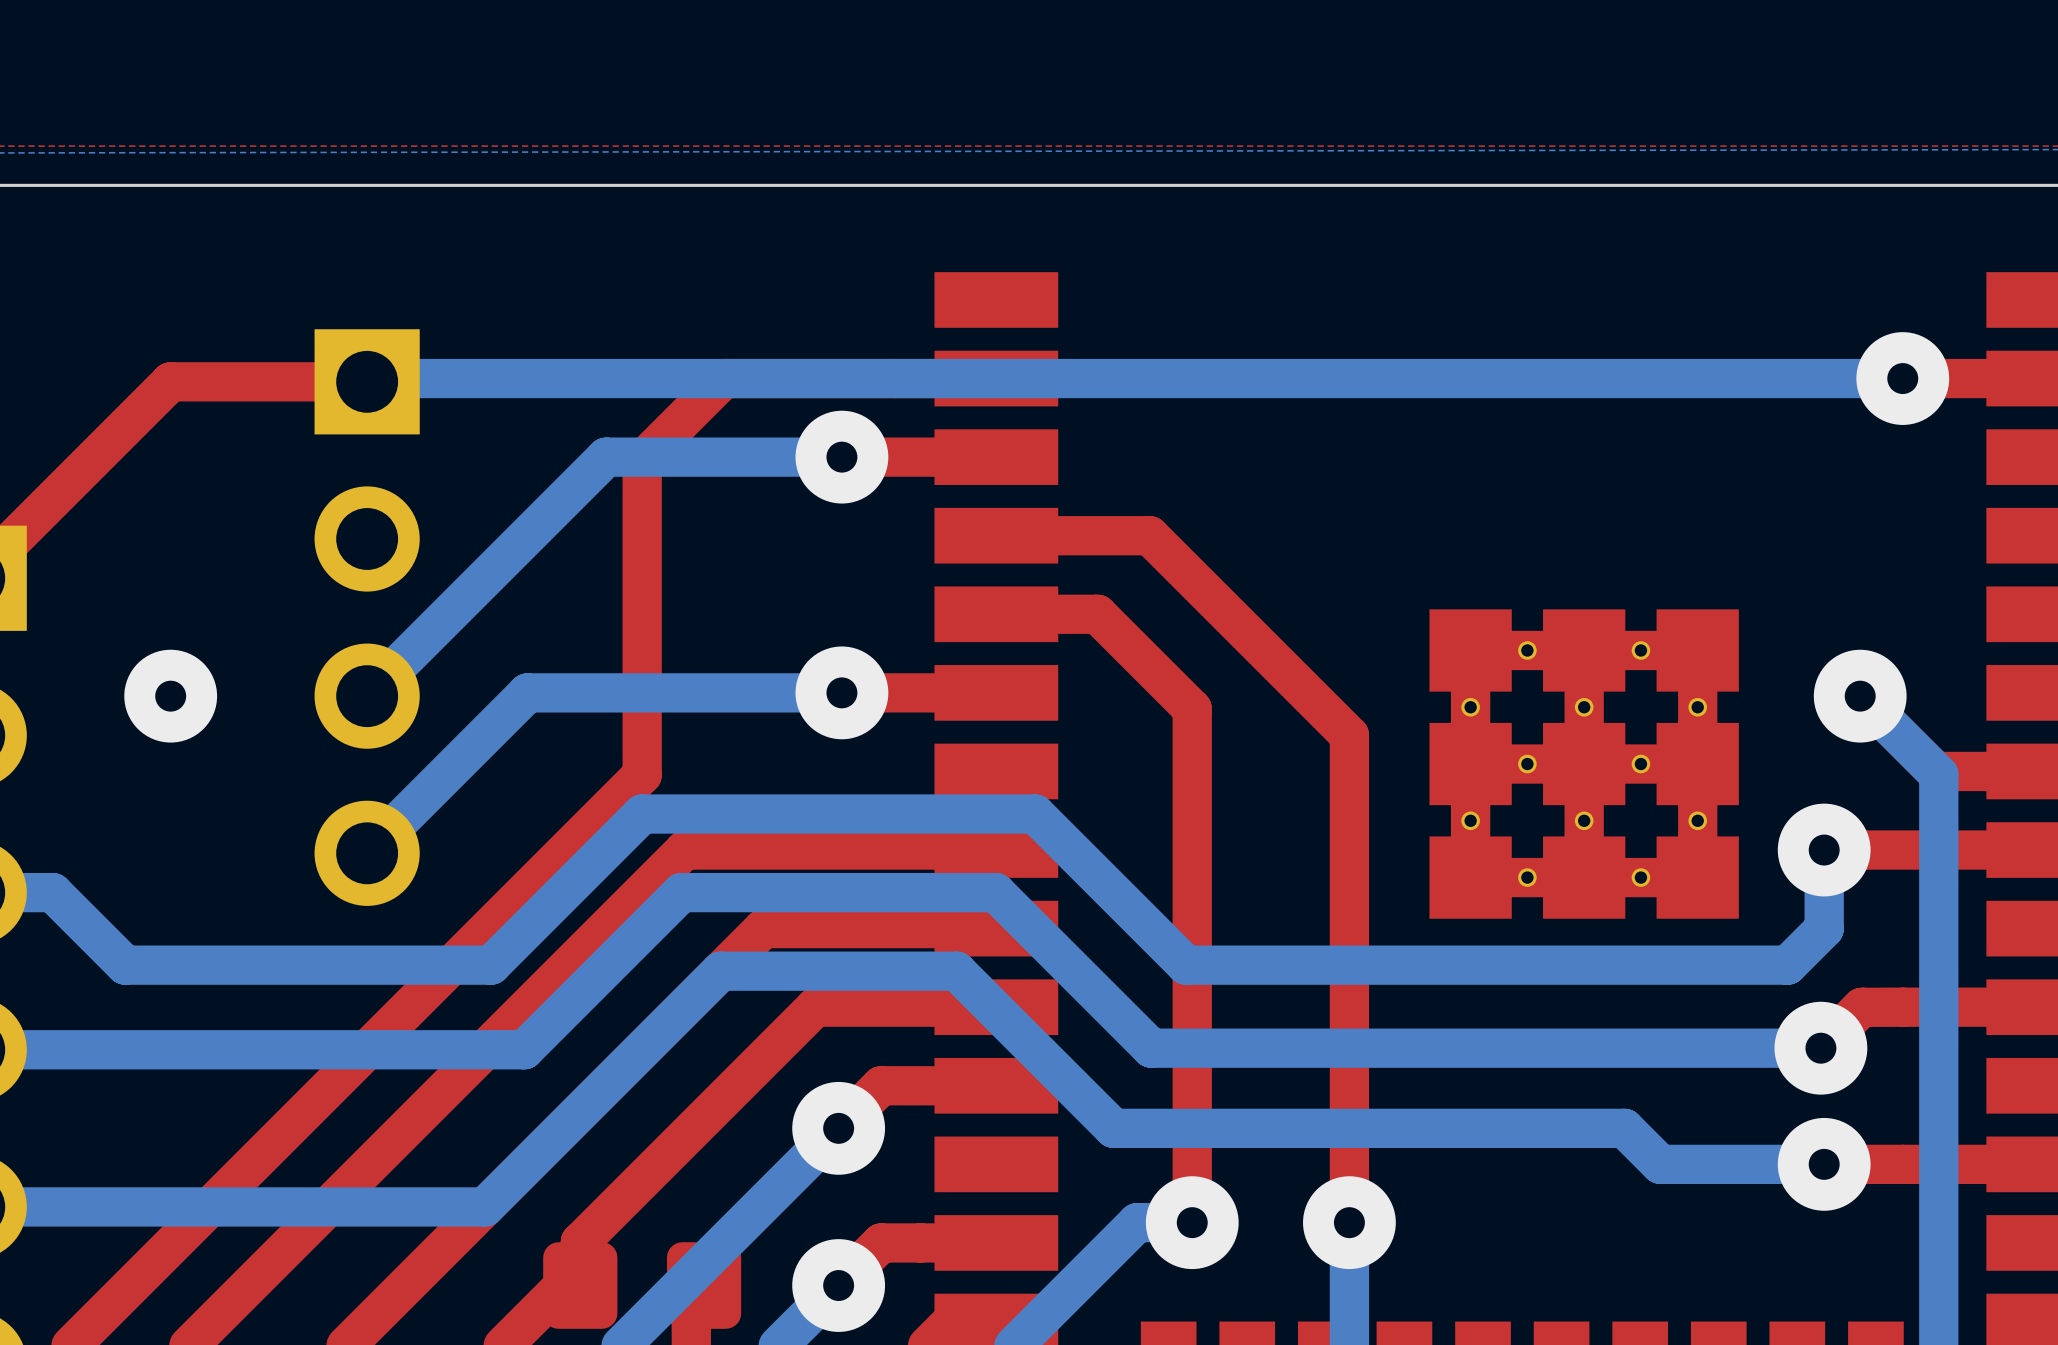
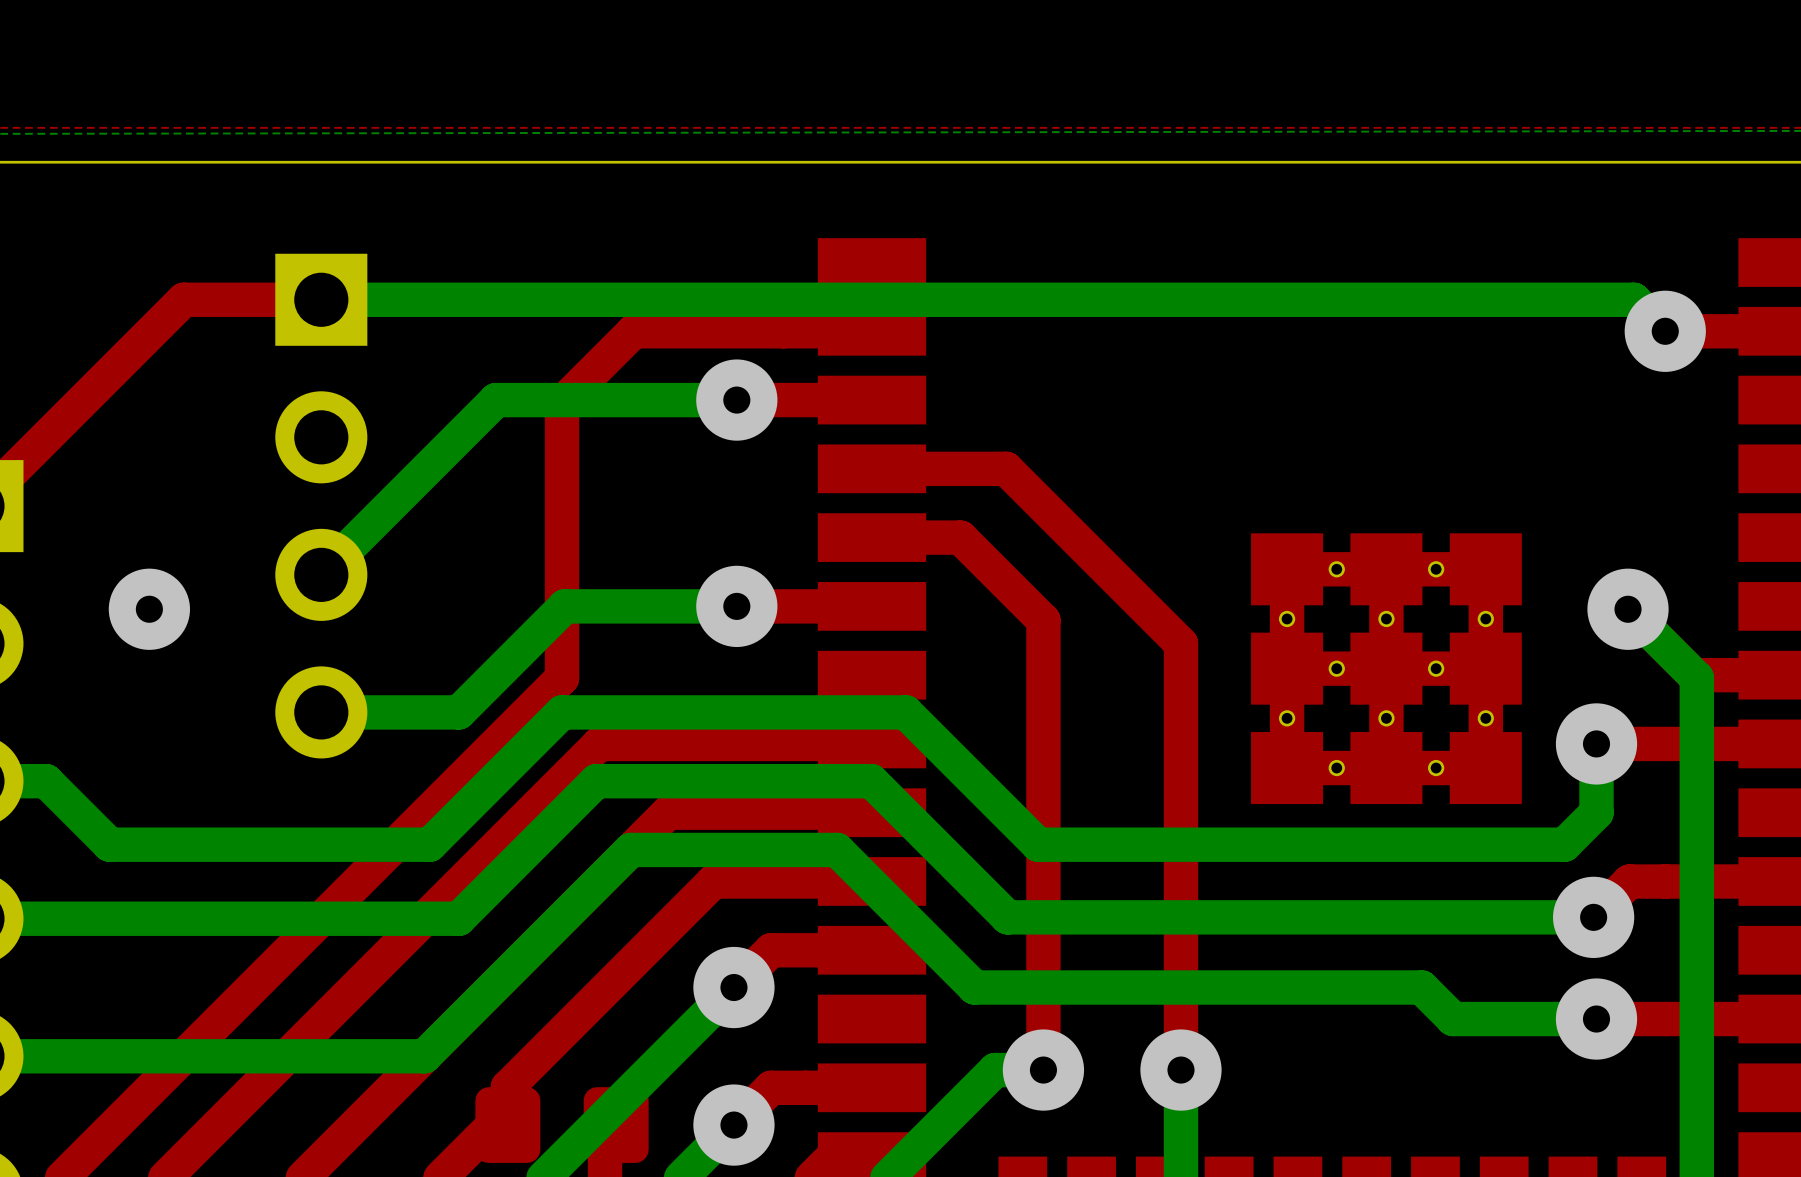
bottom track: (1902, 378) (370, 378) (367, 381) -> (1665, 331) (1633, 299) (355, 299)
top track: (367, 381) (170, 381) -> (321, 299) (183, 299) (149, 334)
bottom track: (606, 457) (367, 696) -> (530, 400) (496, 400) (321, 574)
part position: (367, 617) -> (321, 506)
bottom track: (645, 692) (527, 692) (367, 853) -> (564, 606) (458, 712) (321, 712)

